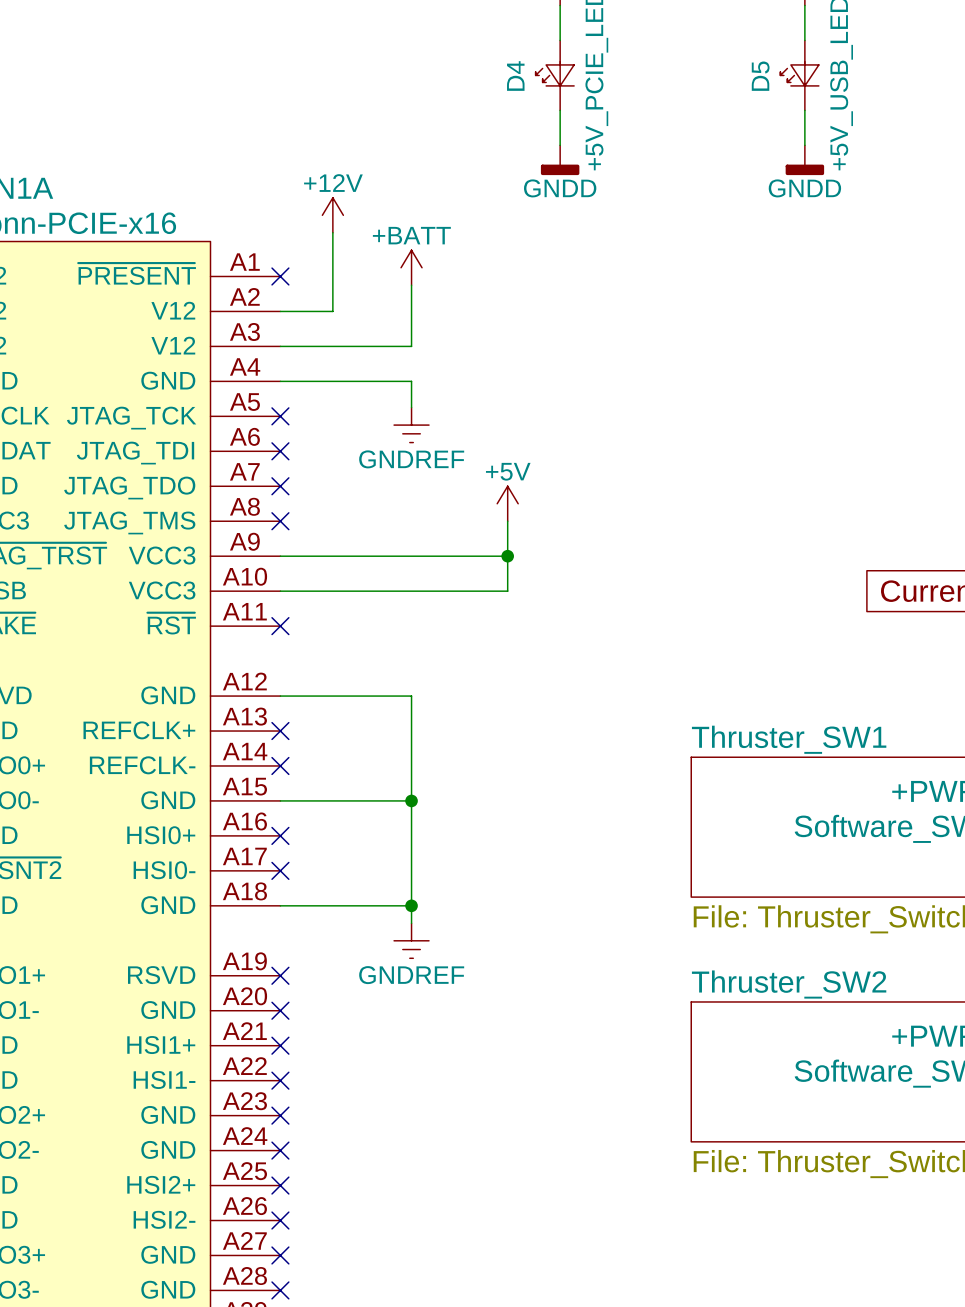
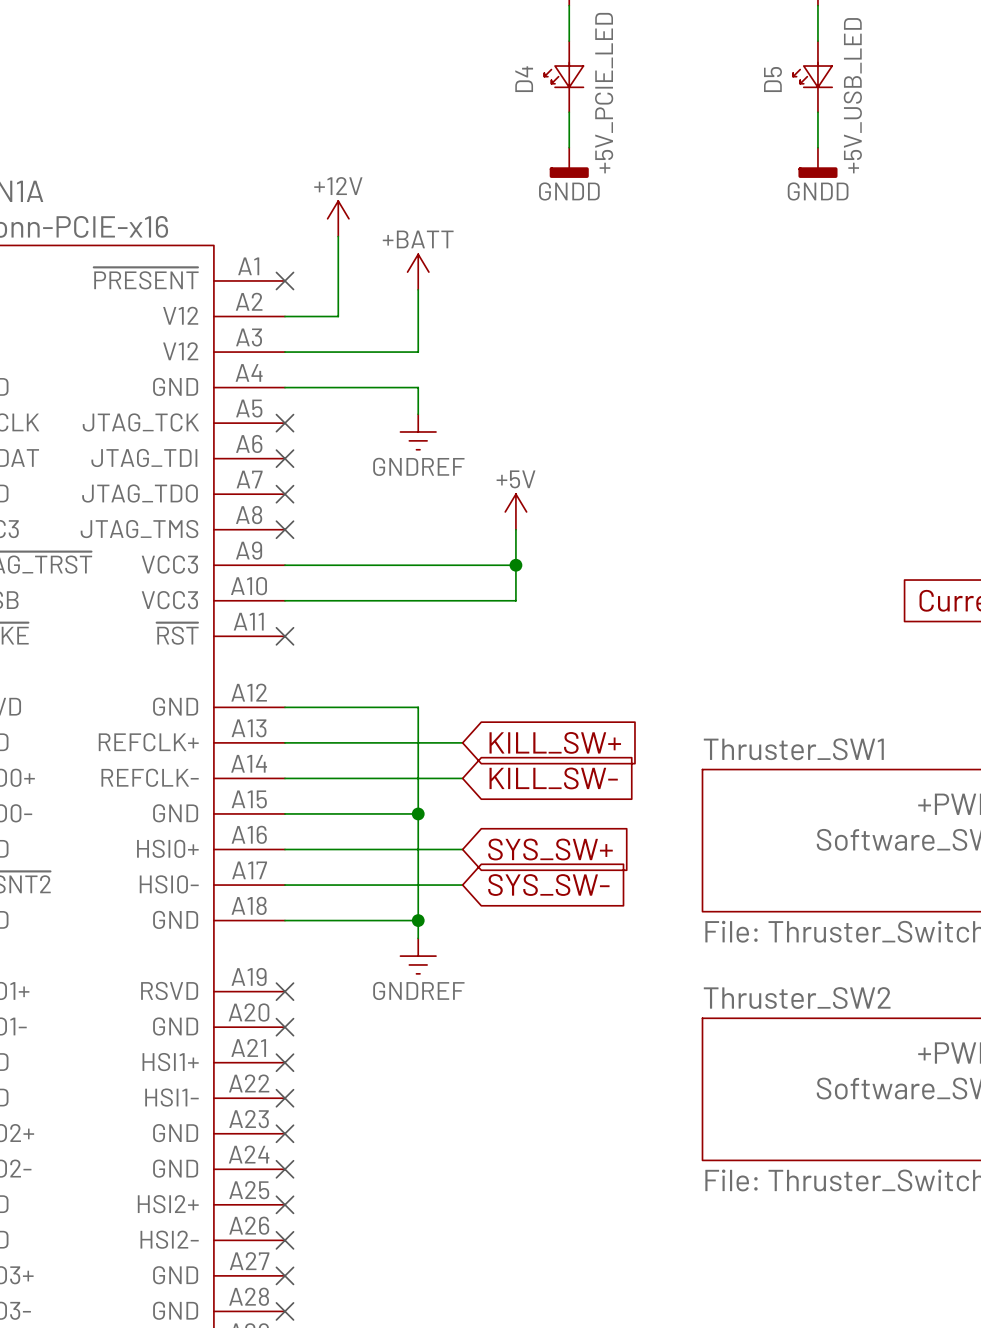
wire: none -> (284, 742) (462, 742)
no-connect mark: (280, 731) -> none
global label: none -> KILL_SW+ (555, 742)
wire: none -> (284, 778) (462, 778)
no-connect mark: (280, 765) -> none
global label: none -> KILL_SW- (553, 778)
wire: none -> (284, 849) (462, 849)
no-connect mark: (280, 835) -> none
global label: none -> SYS_SW+ (550, 849)
wire: none -> (284, 885) (462, 885)
no-connect mark: (280, 870) -> none
global label: none -> SYS_SW- (548, 885)

